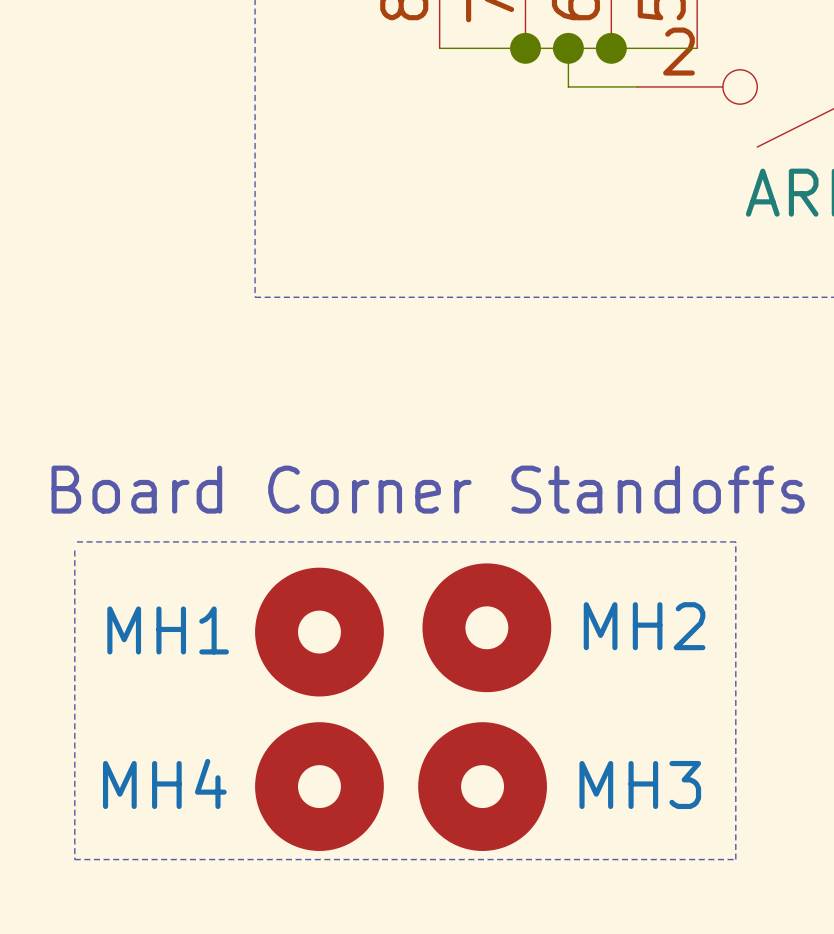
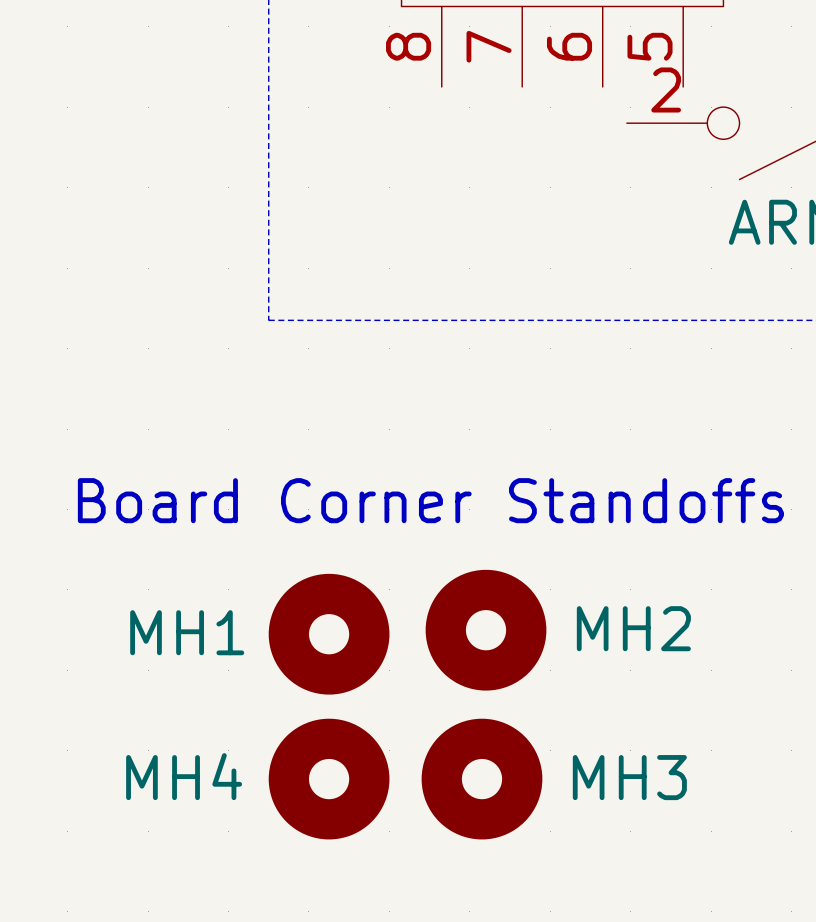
wire: (439, 48) (697, 48) -> none
junction: (525, 48) -> none
wire: (568, 48) (568, 86) (637, 86) -> none
junction: (568, 48) -> none
junction: (611, 48) -> none
line: (74, 541) (735, 541) (735, 859) (74, 859) (74, 550) -> none

